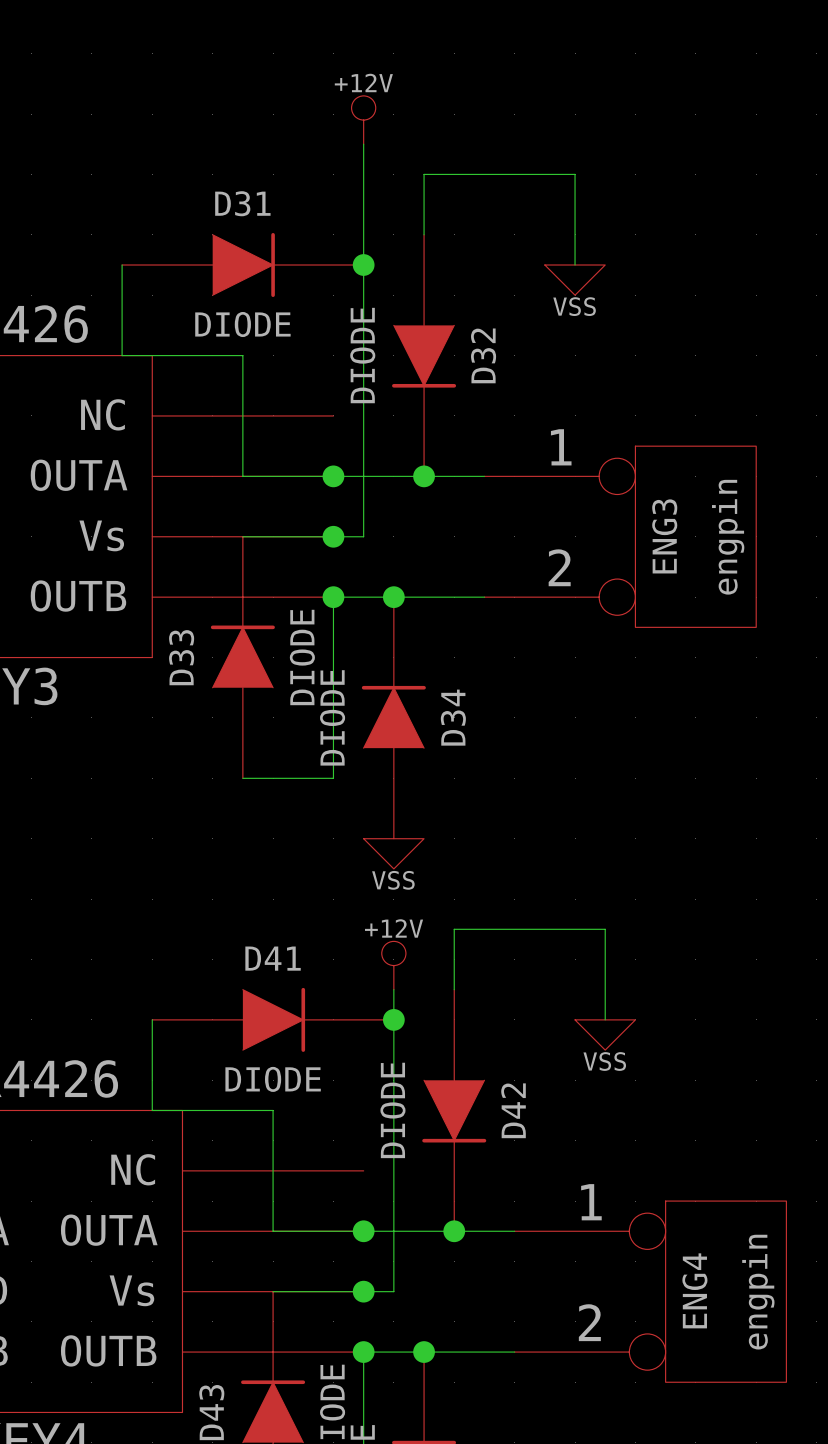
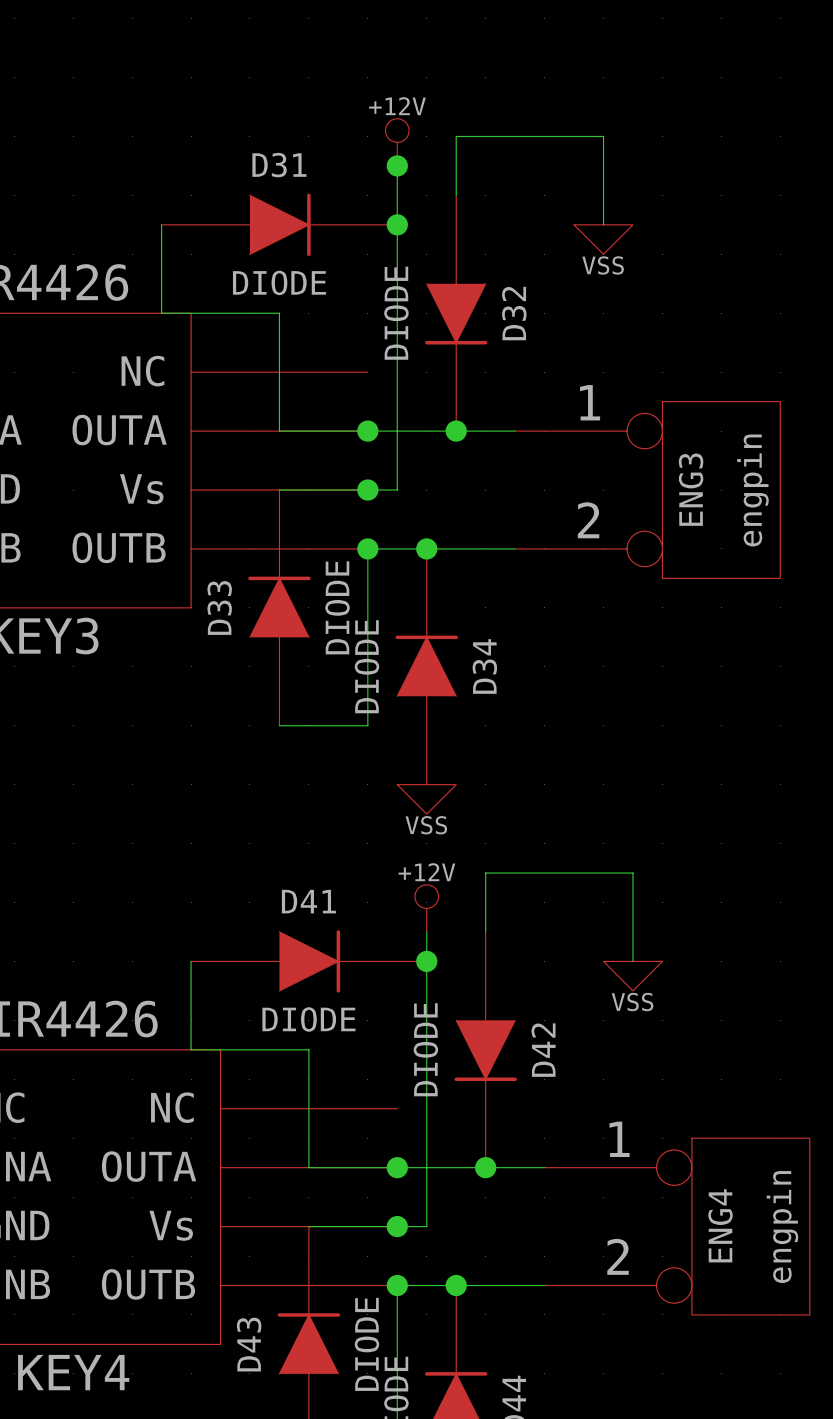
power symbol position: +12V (363, 120) -> +12V (397, 142)
wire: (363, 144) (363, 204) -> none
junction: none -> (397, 165)

